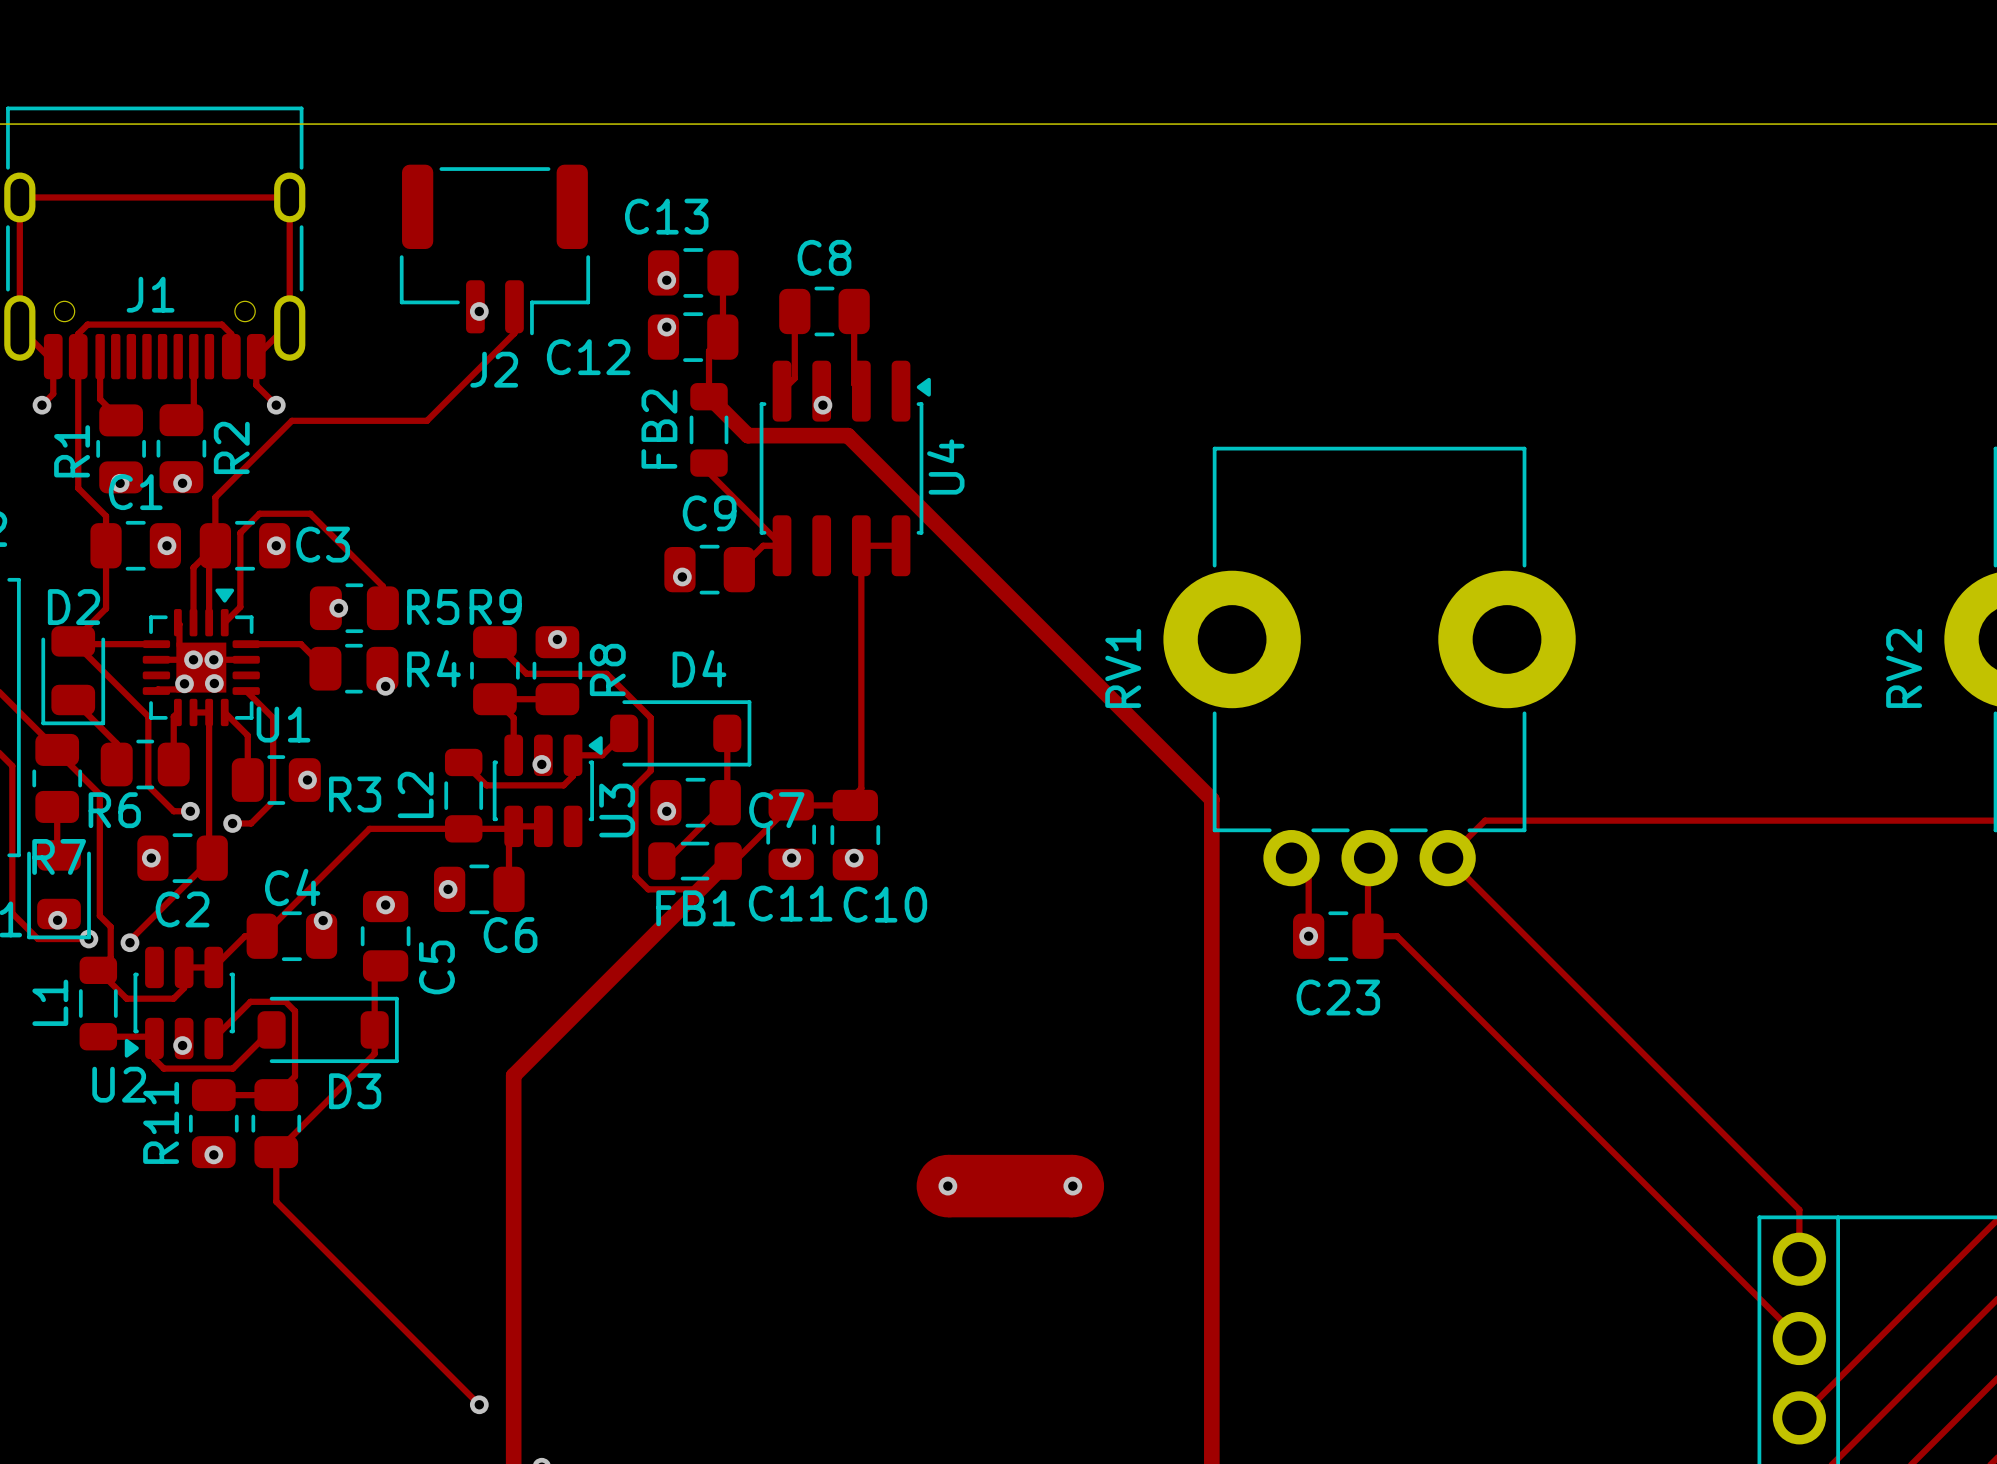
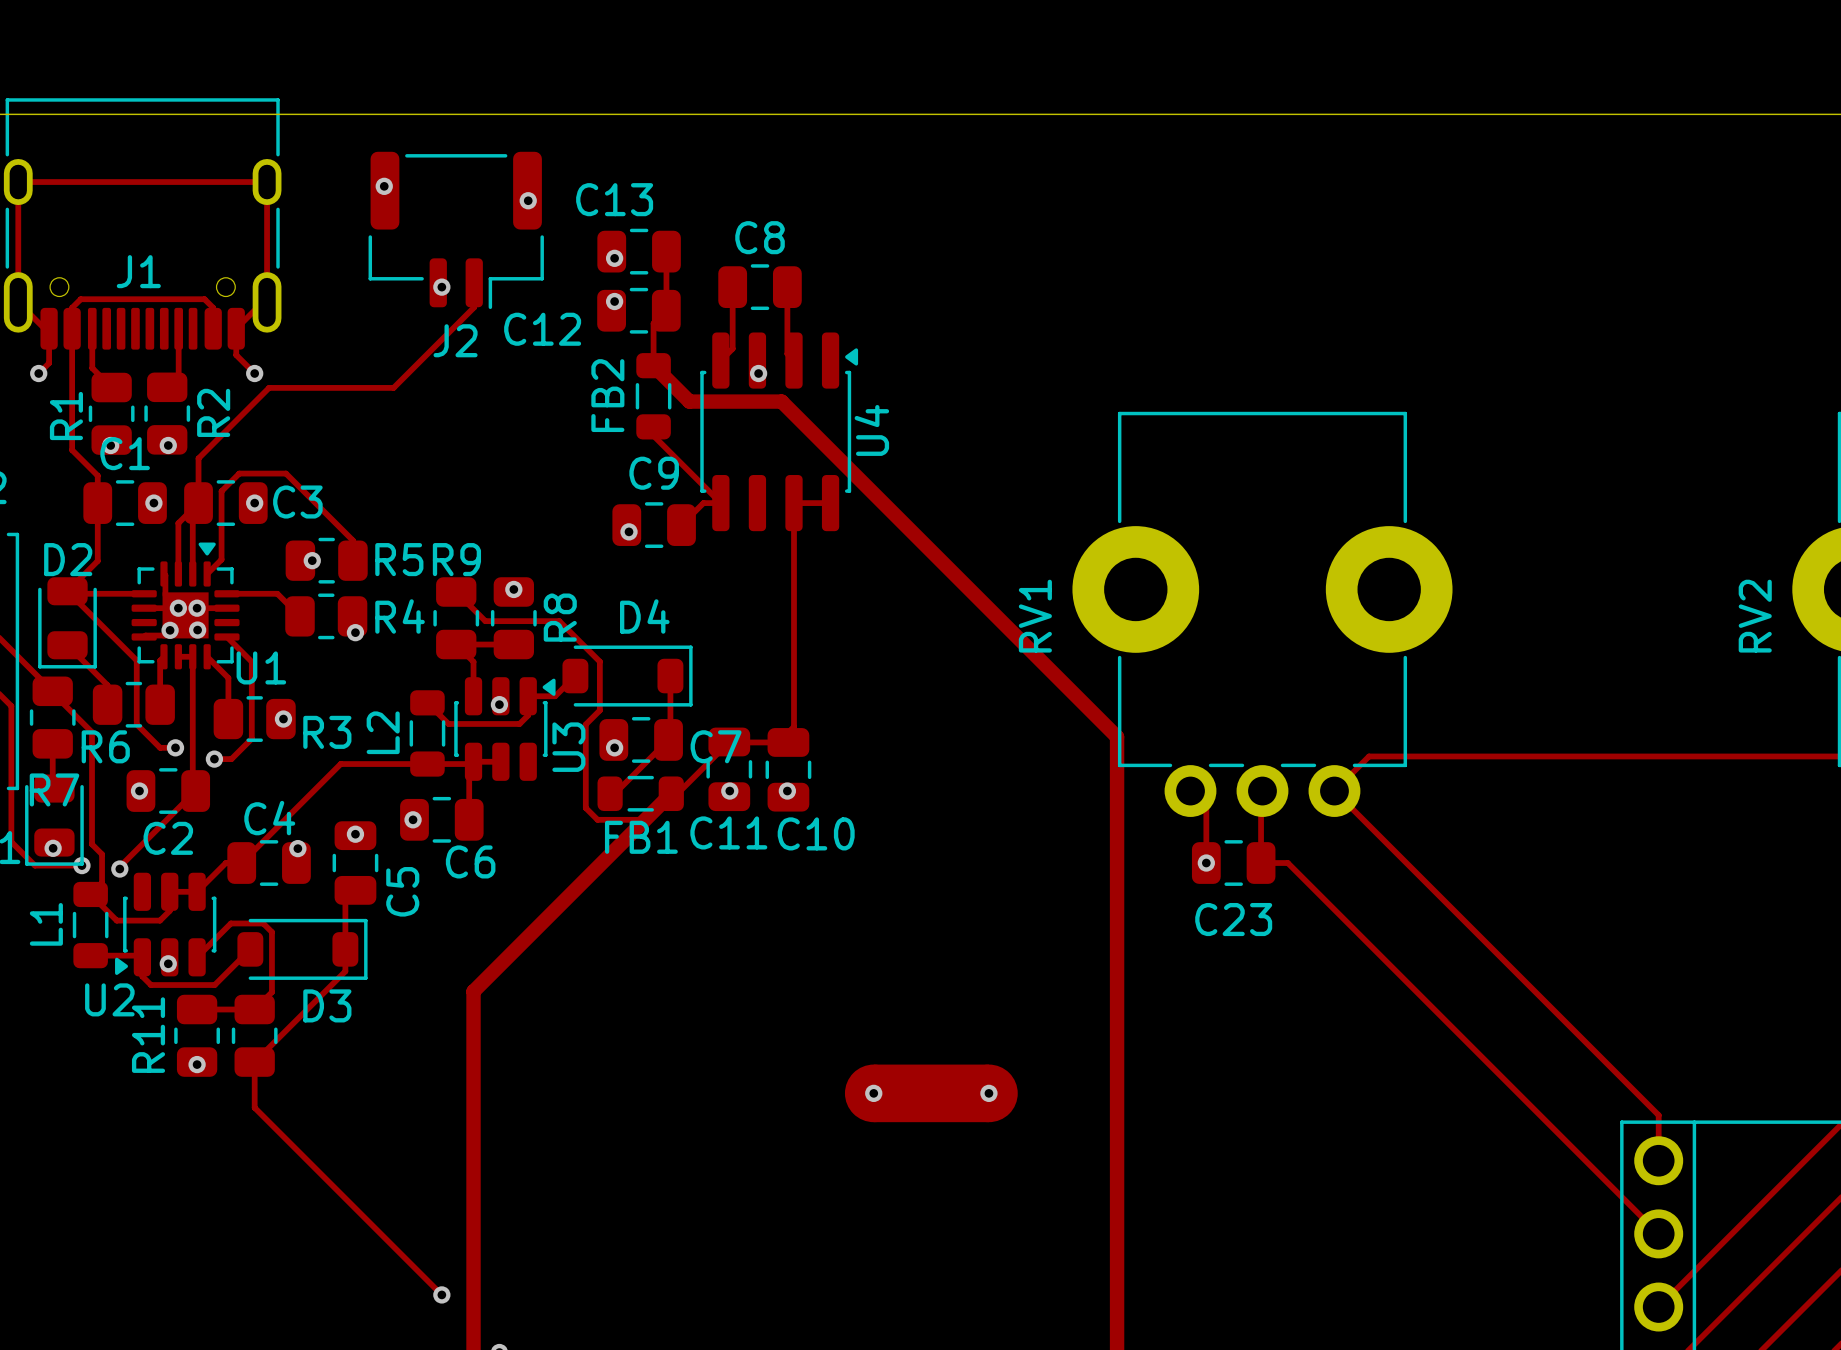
via: none -> (384, 186)
via: none -> (528, 200)

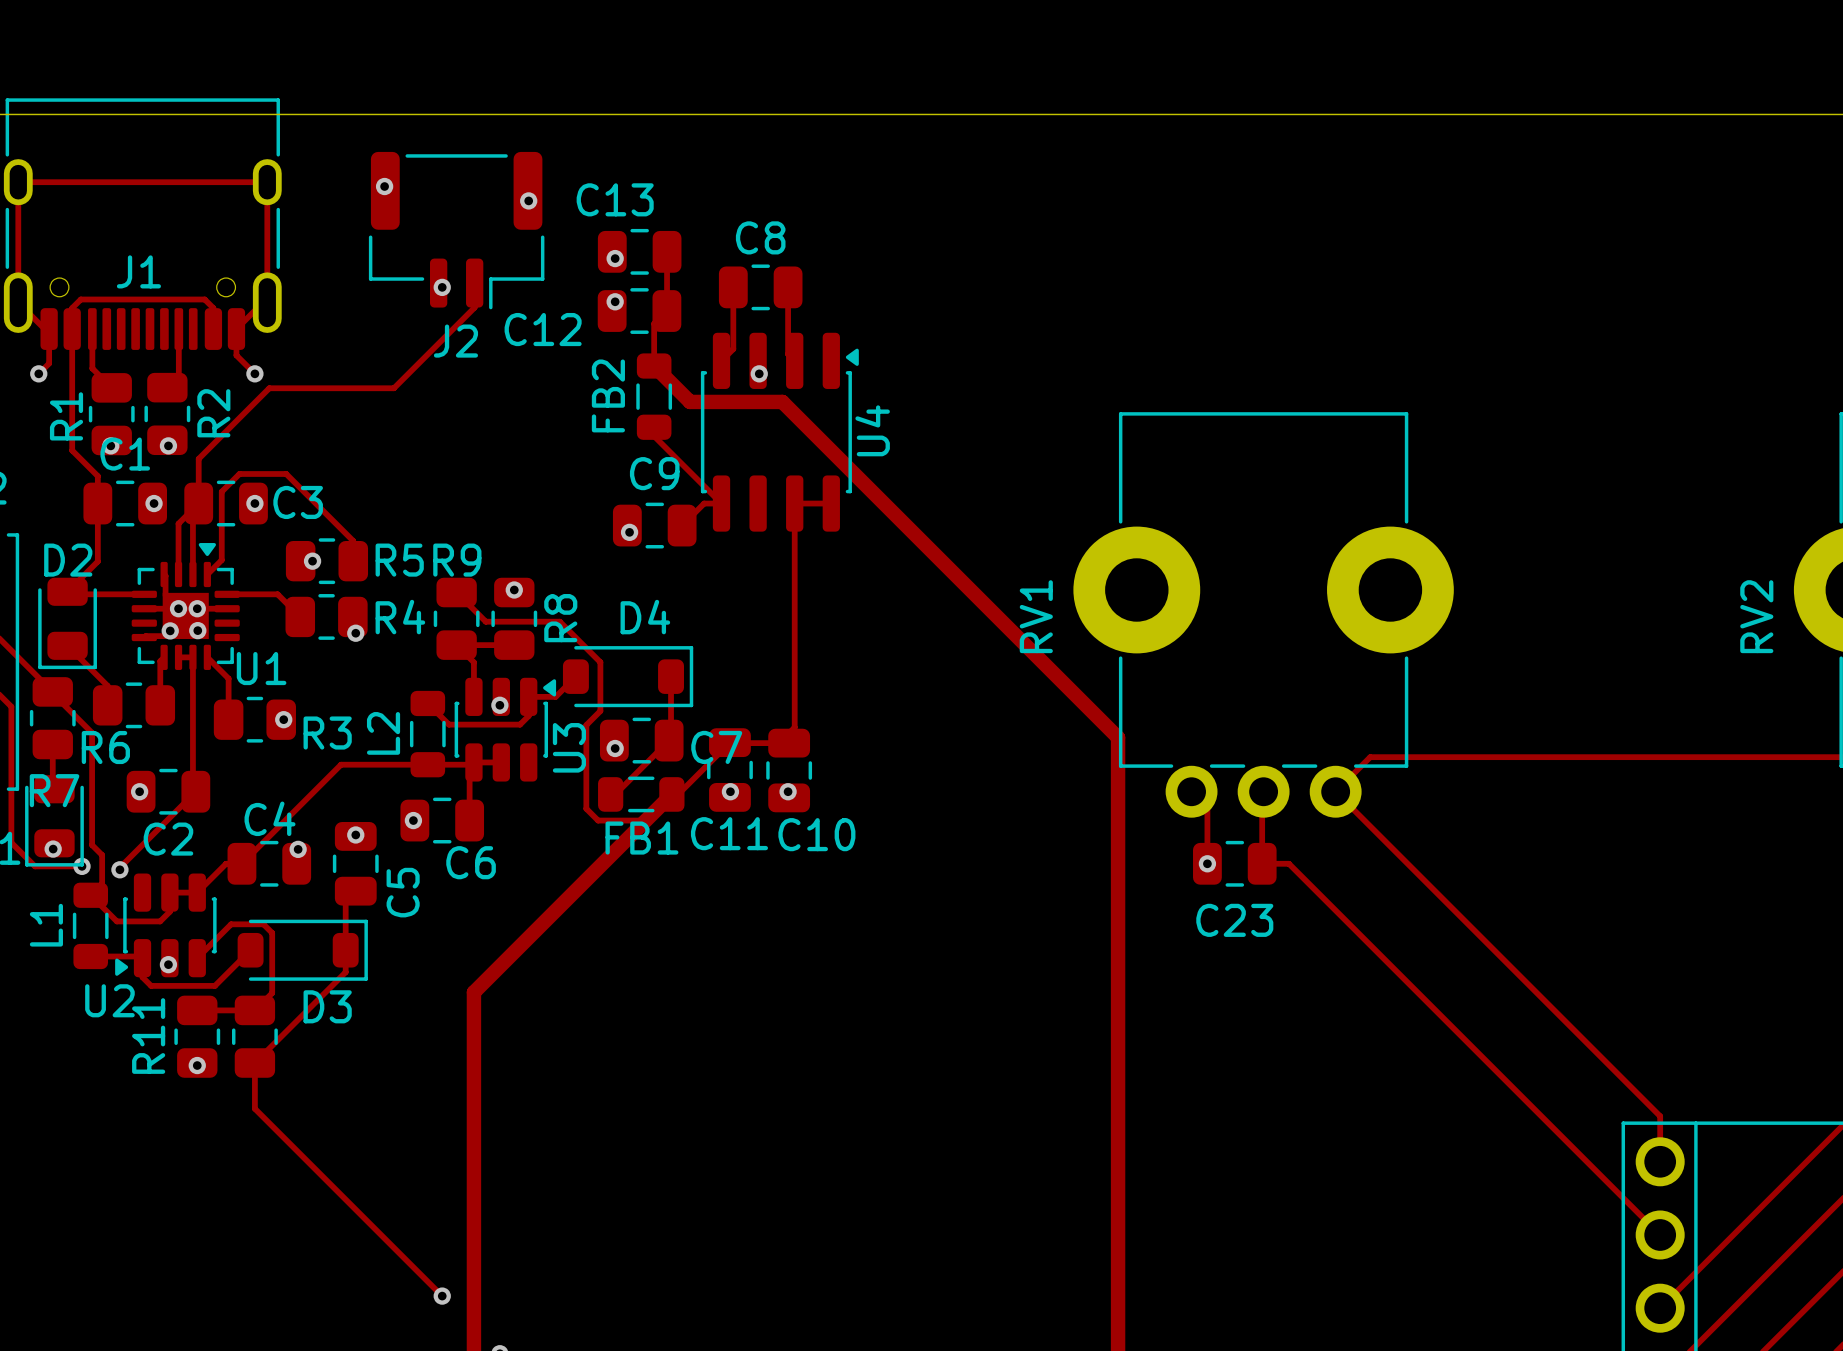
track: (67, 591) (136, 660) (136, 724) (160, 747) (175, 747) -> none
track: (226, 636) (251, 661) (251, 738) (231, 759) (214, 759) -> none
via: (175, 747) -> none
via: (214, 759) -> none
via: (873, 1093) -> none
part: (931, 1093) -> none
via: (988, 1093) -> none

